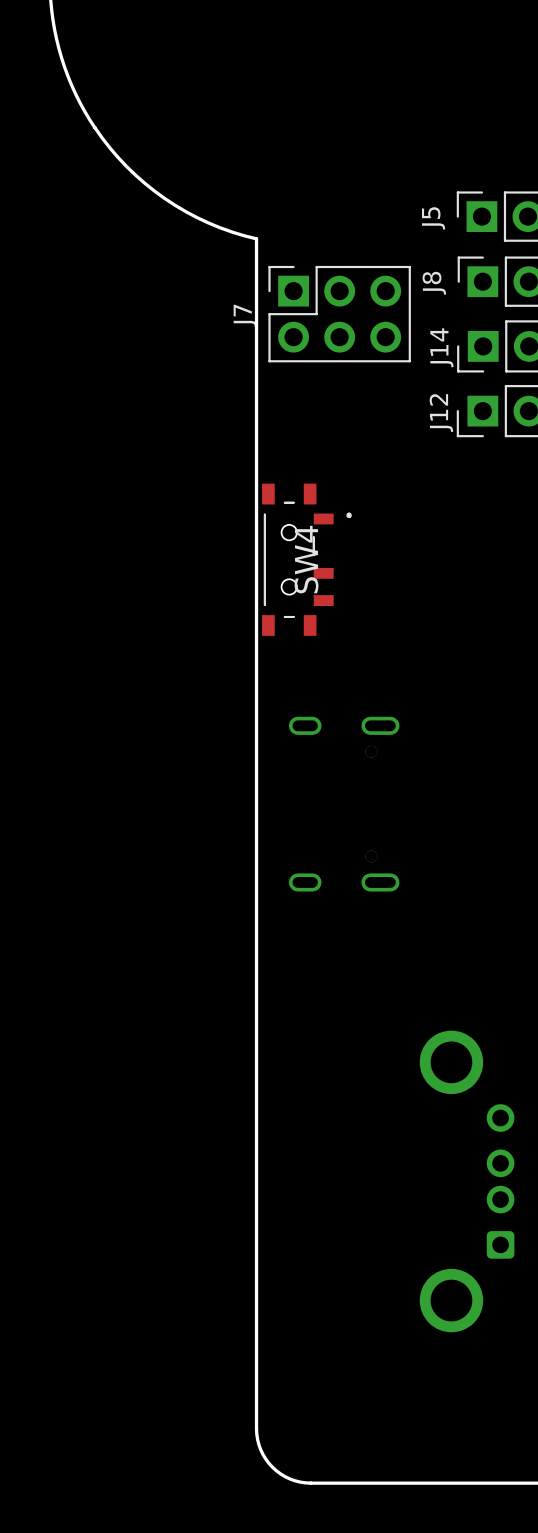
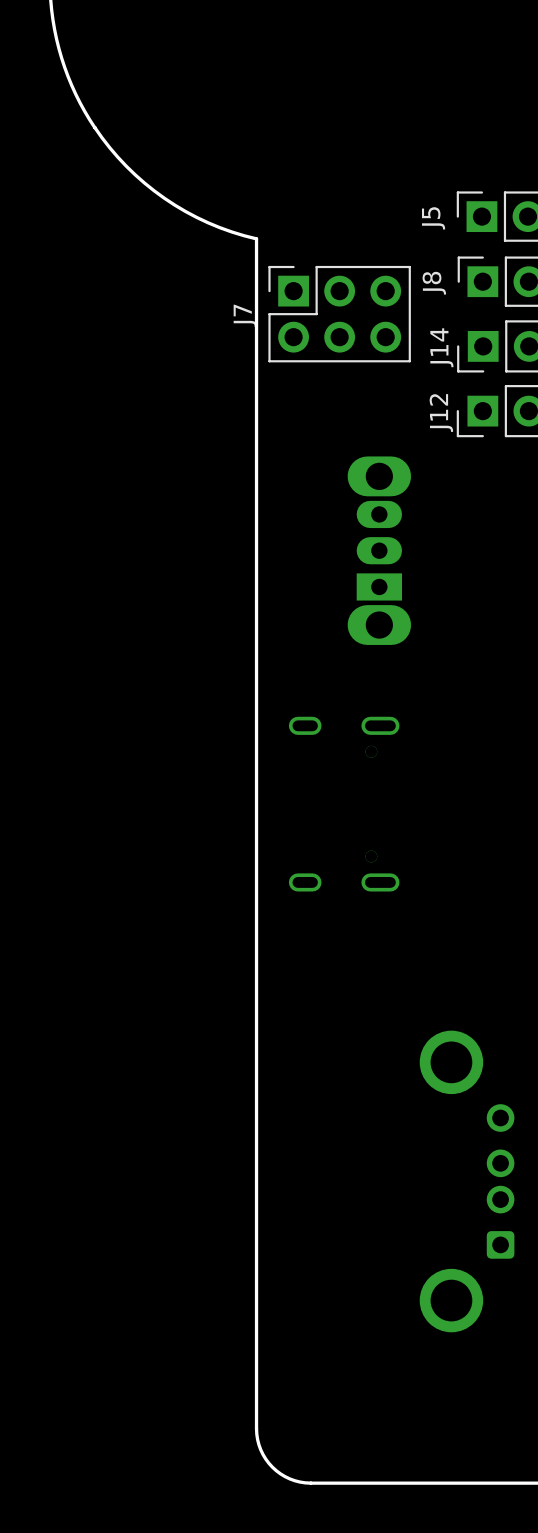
part: none -> (379, 550)
SW4: (306, 559) -> none

